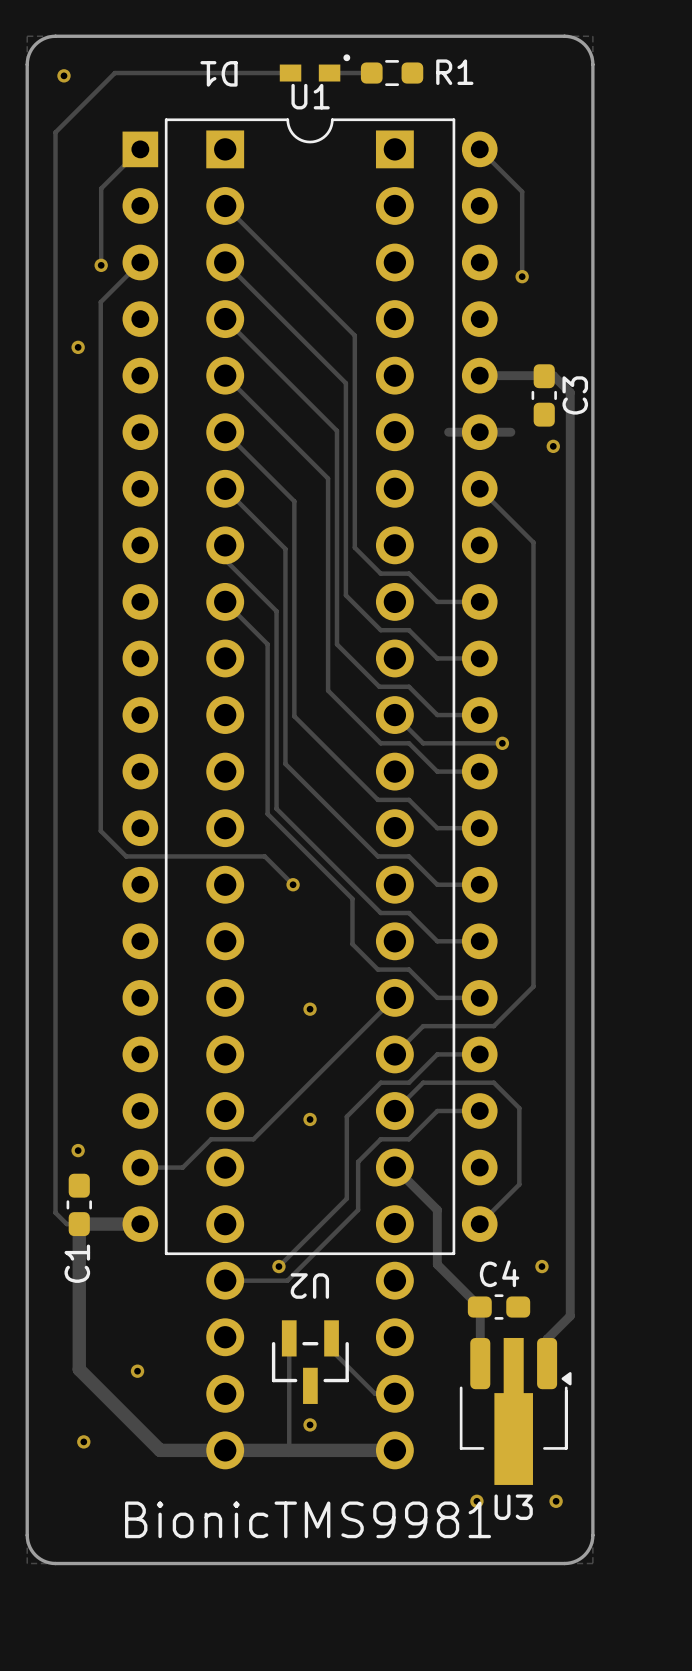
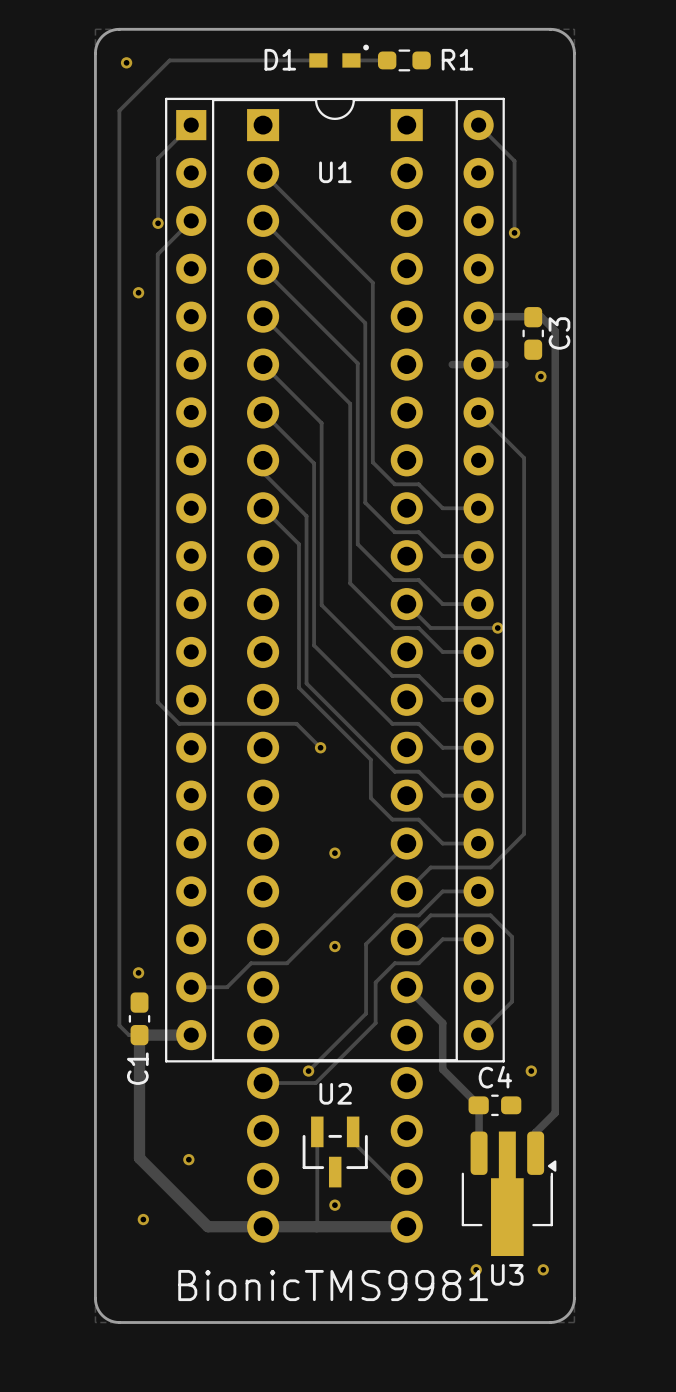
D1 name rotation: 0° (219, 73) -> 180° (280, 59)
U1 name position: U1 (310, 96) -> U1 (335, 172)
U1 footprint: [122, 118, 498, 1256] -> [165, 97, 505, 1063]
U2 name rotation: 0° (309, 1286) -> 180° (335, 1093)

